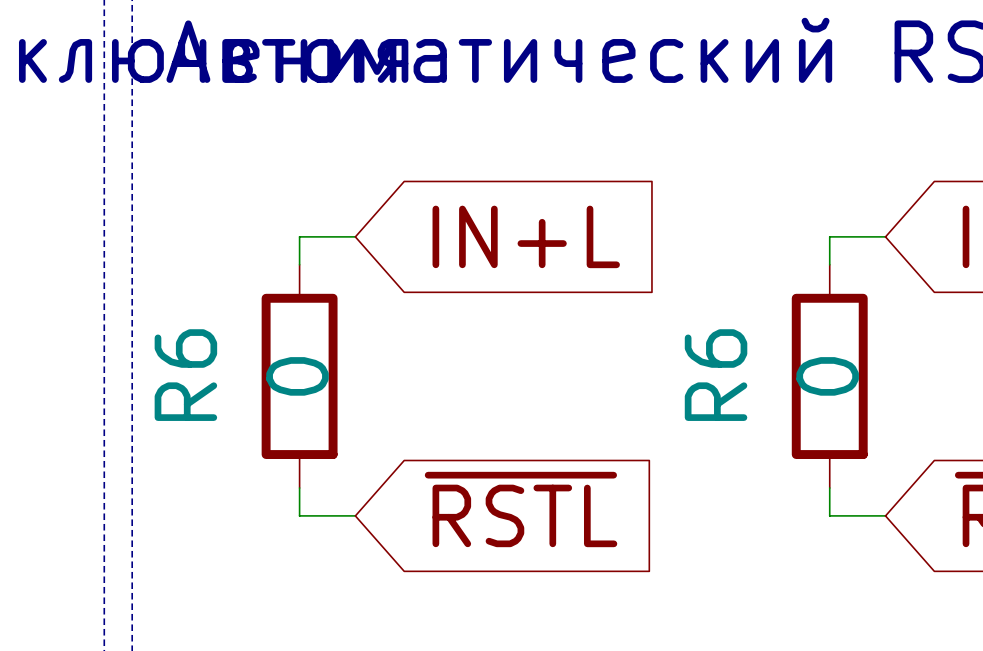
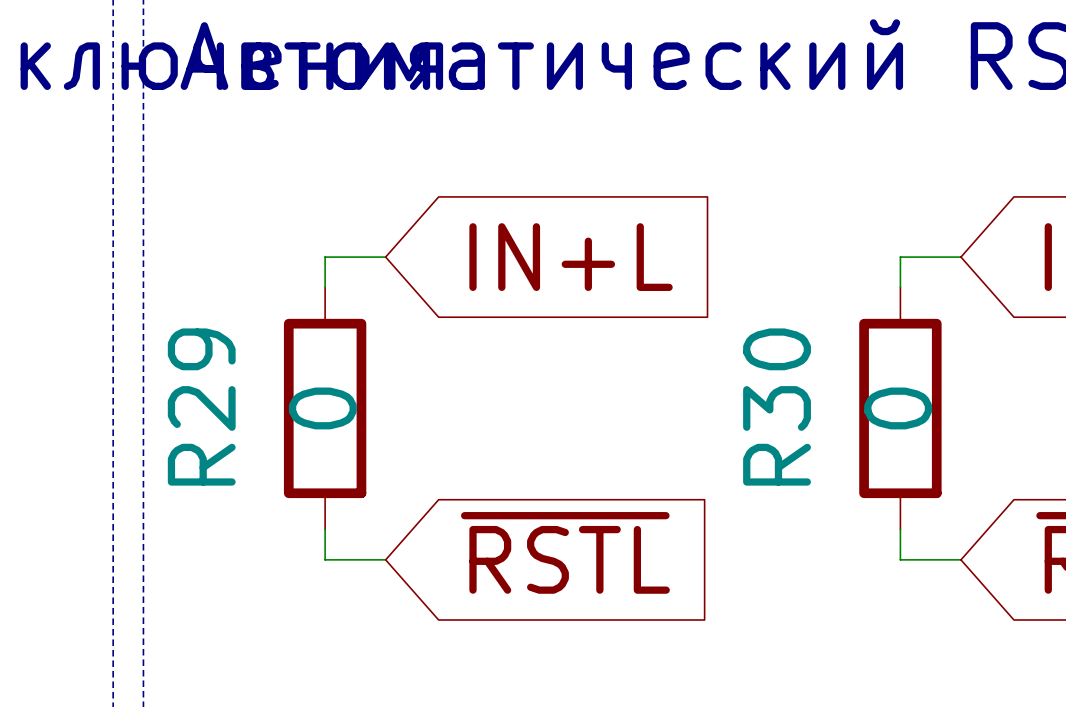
R6 name: R6 (185, 375) -> R29 (201, 407)
R6 name: R6 (716, 375) -> R30 (777, 407)

